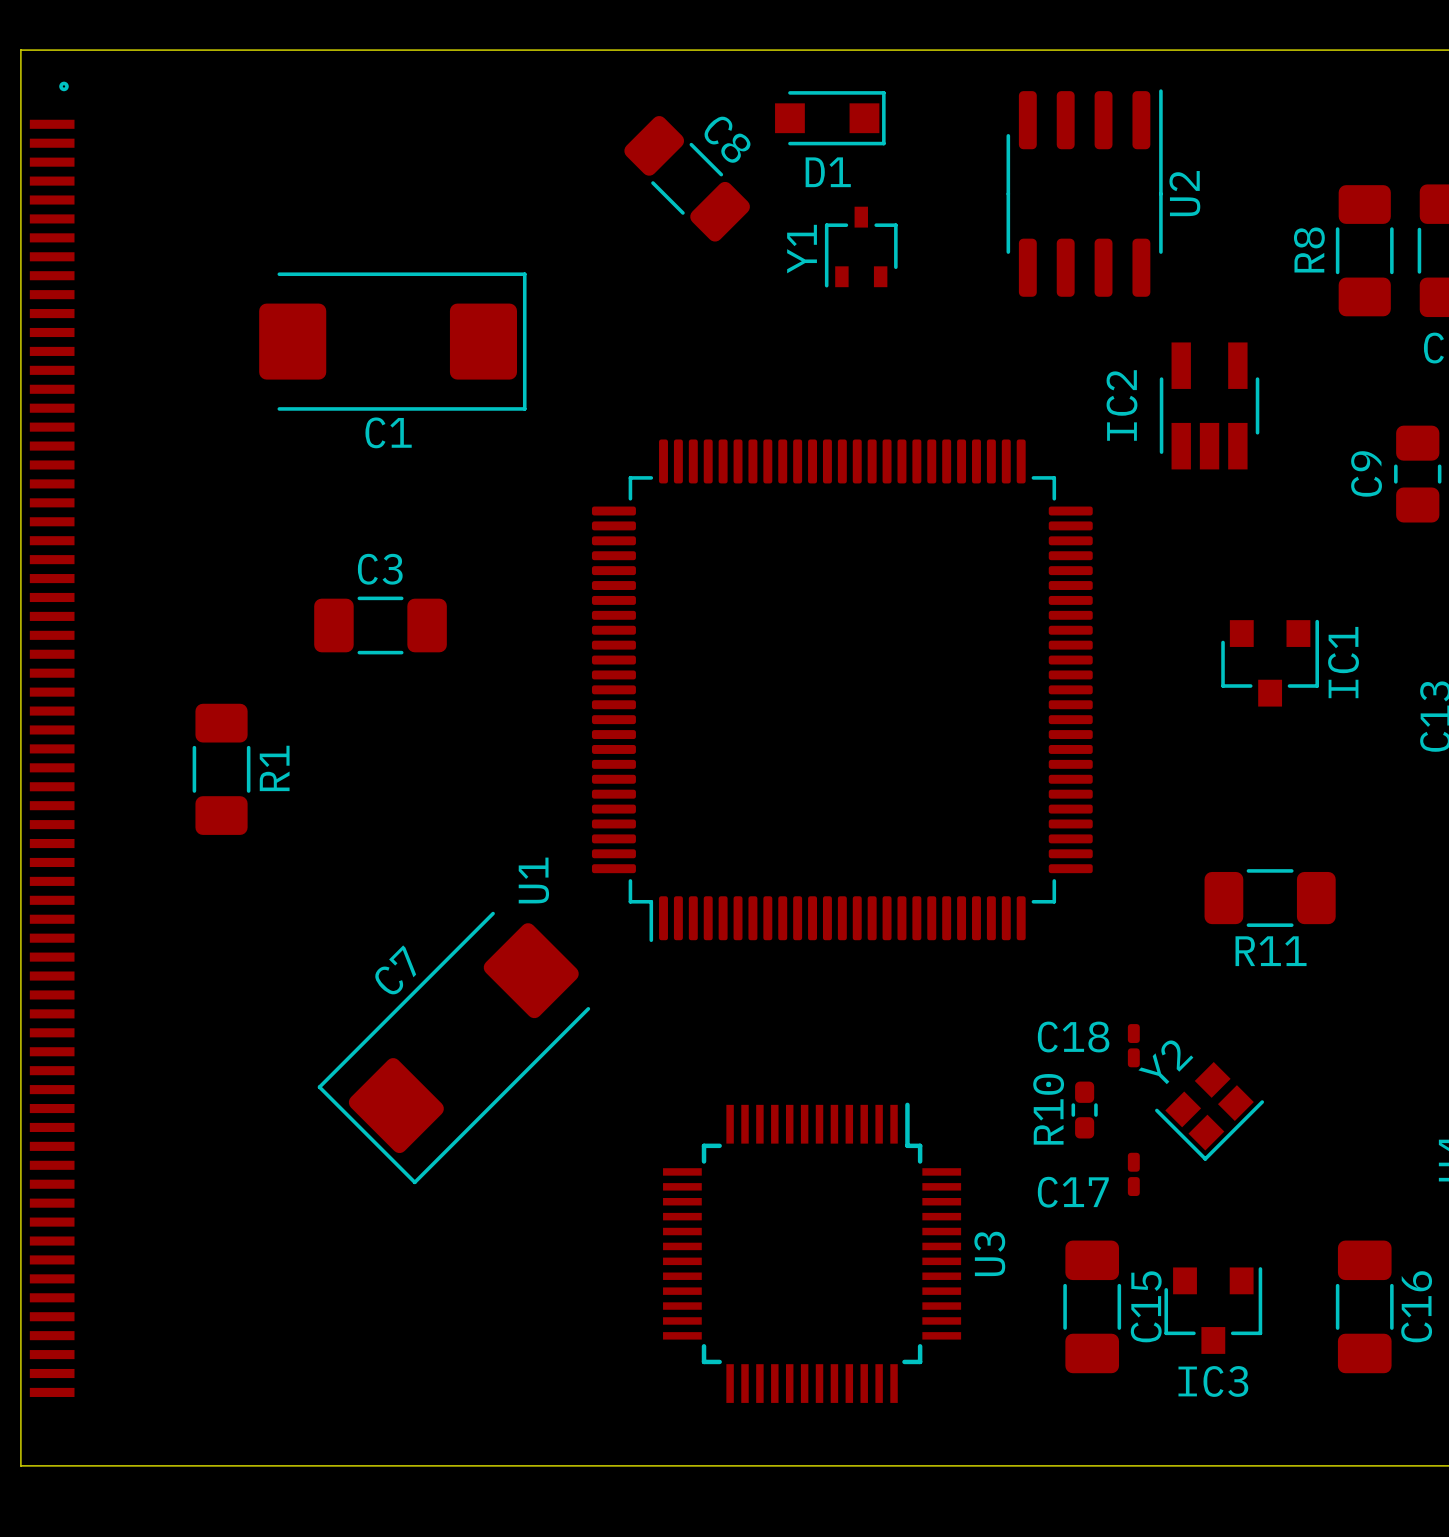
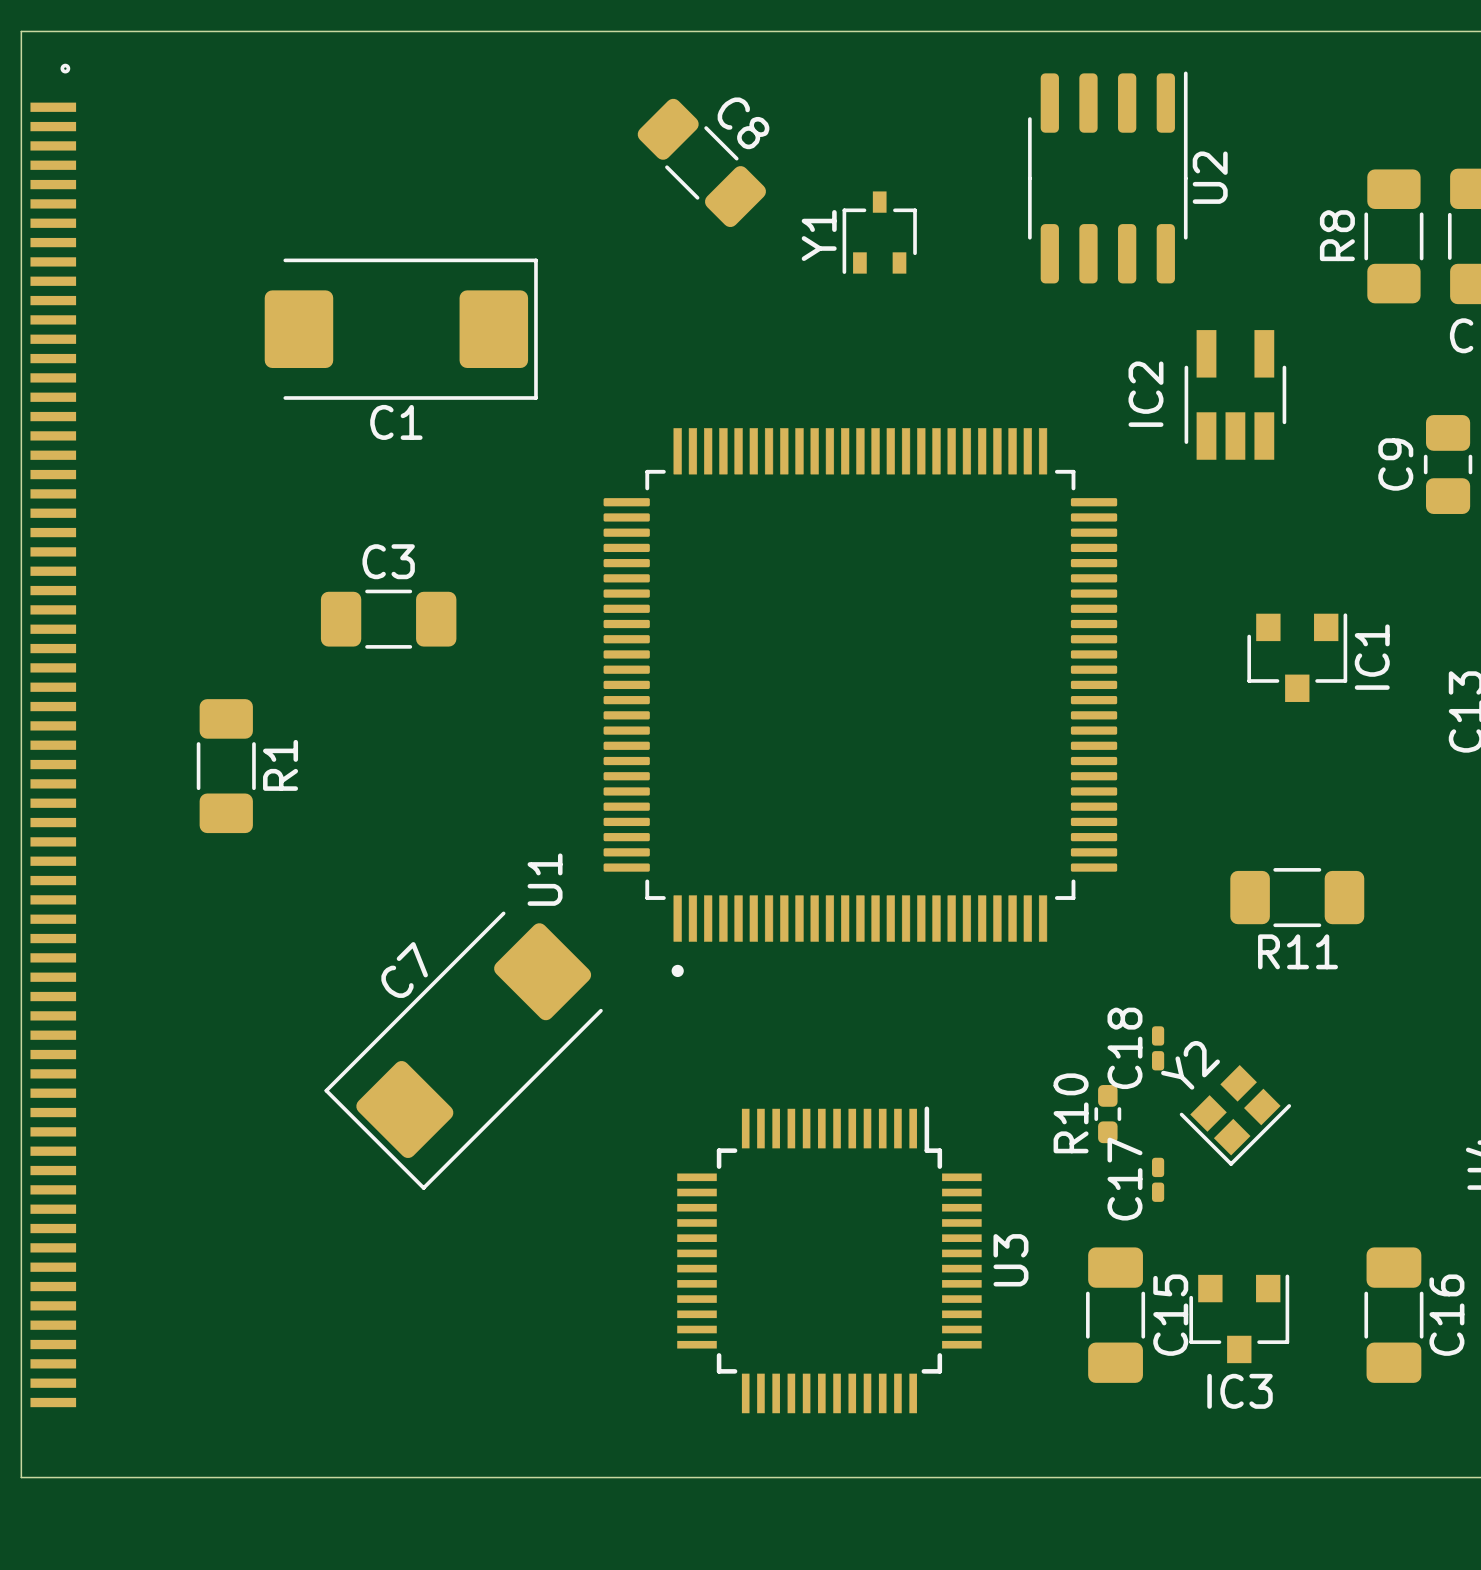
D1: (830, 118) -> none
U1 footprint: [591, 439, 1093, 943] -> [603, 428, 1118, 978]
C18 name rotation: 0° (1073, 1037) -> 90° counterclockwise (1124, 1048)
C17 name rotation: 0° (1073, 1192) -> 90° counterclockwise (1124, 1179)

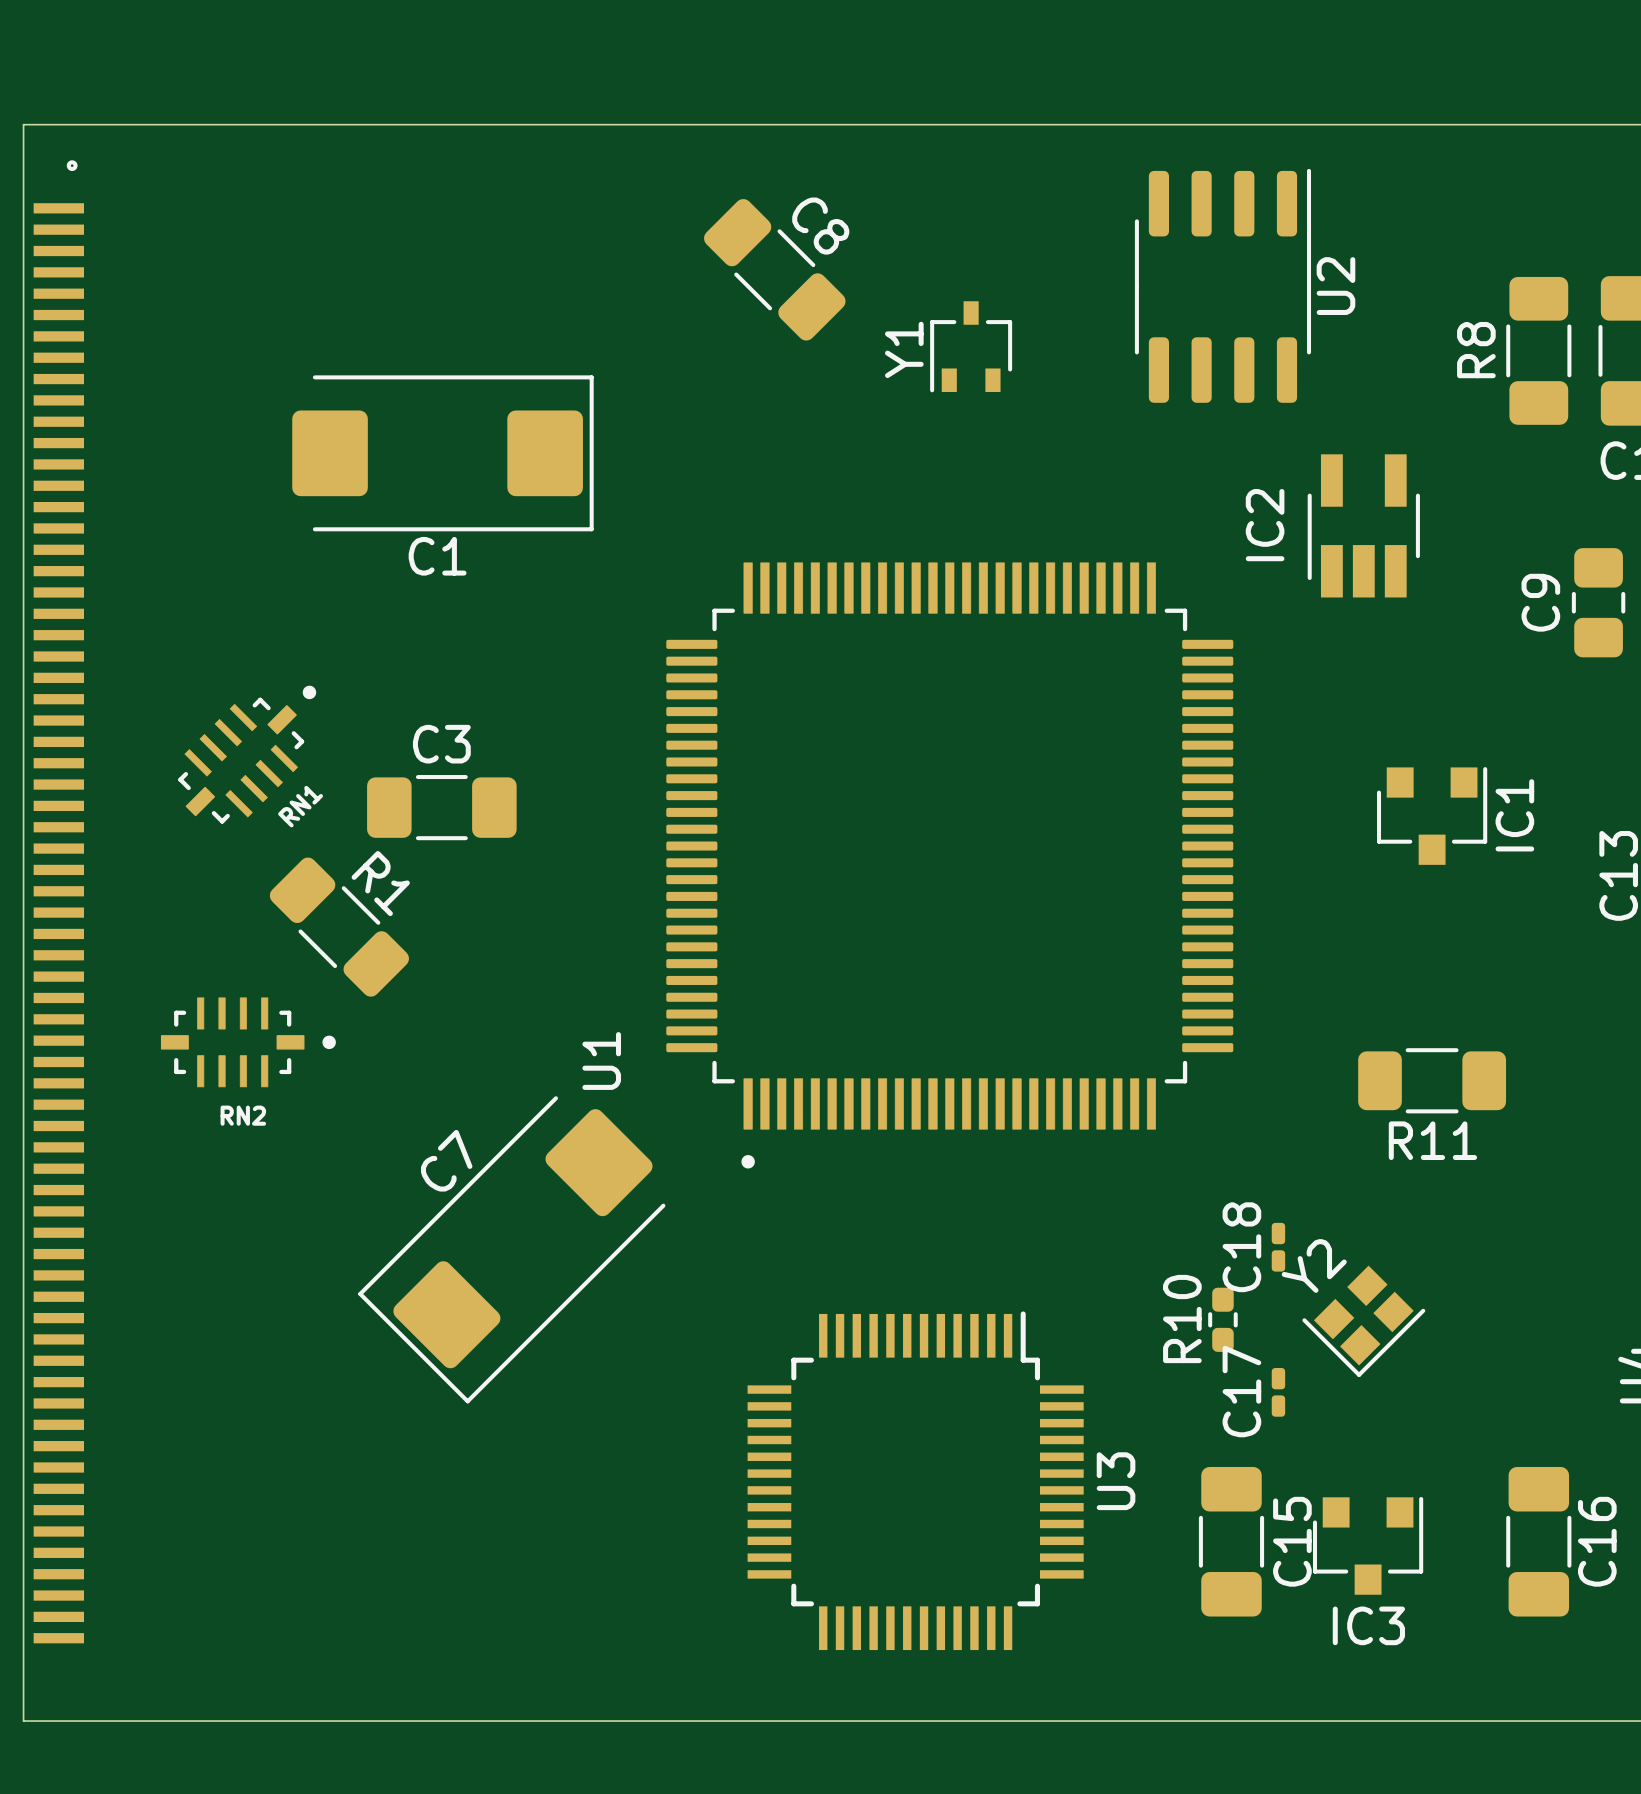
RN1: none -> (247, 754)
C3 position: (388, 619) -> (441, 807)
R1 rotation: 0° (226, 766) -> 45° counterclockwise (339, 927)
R1 position: (226, 766) -> (339, 927)
RN2: none -> (248, 1042)

